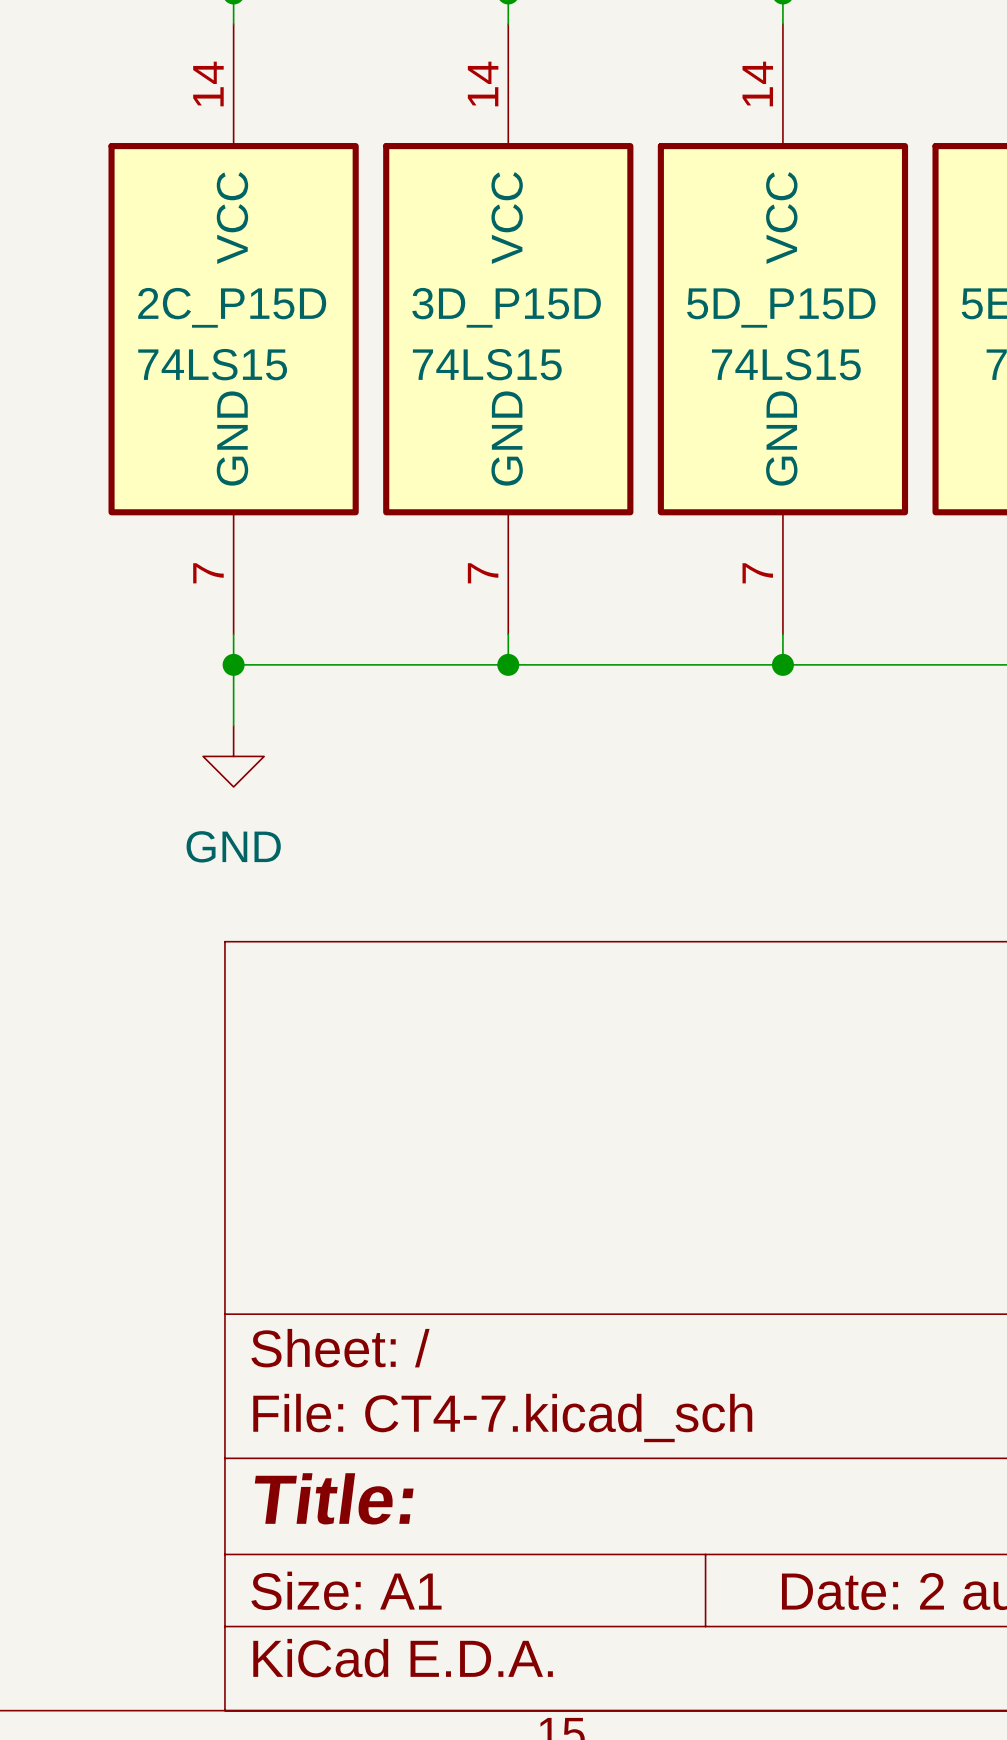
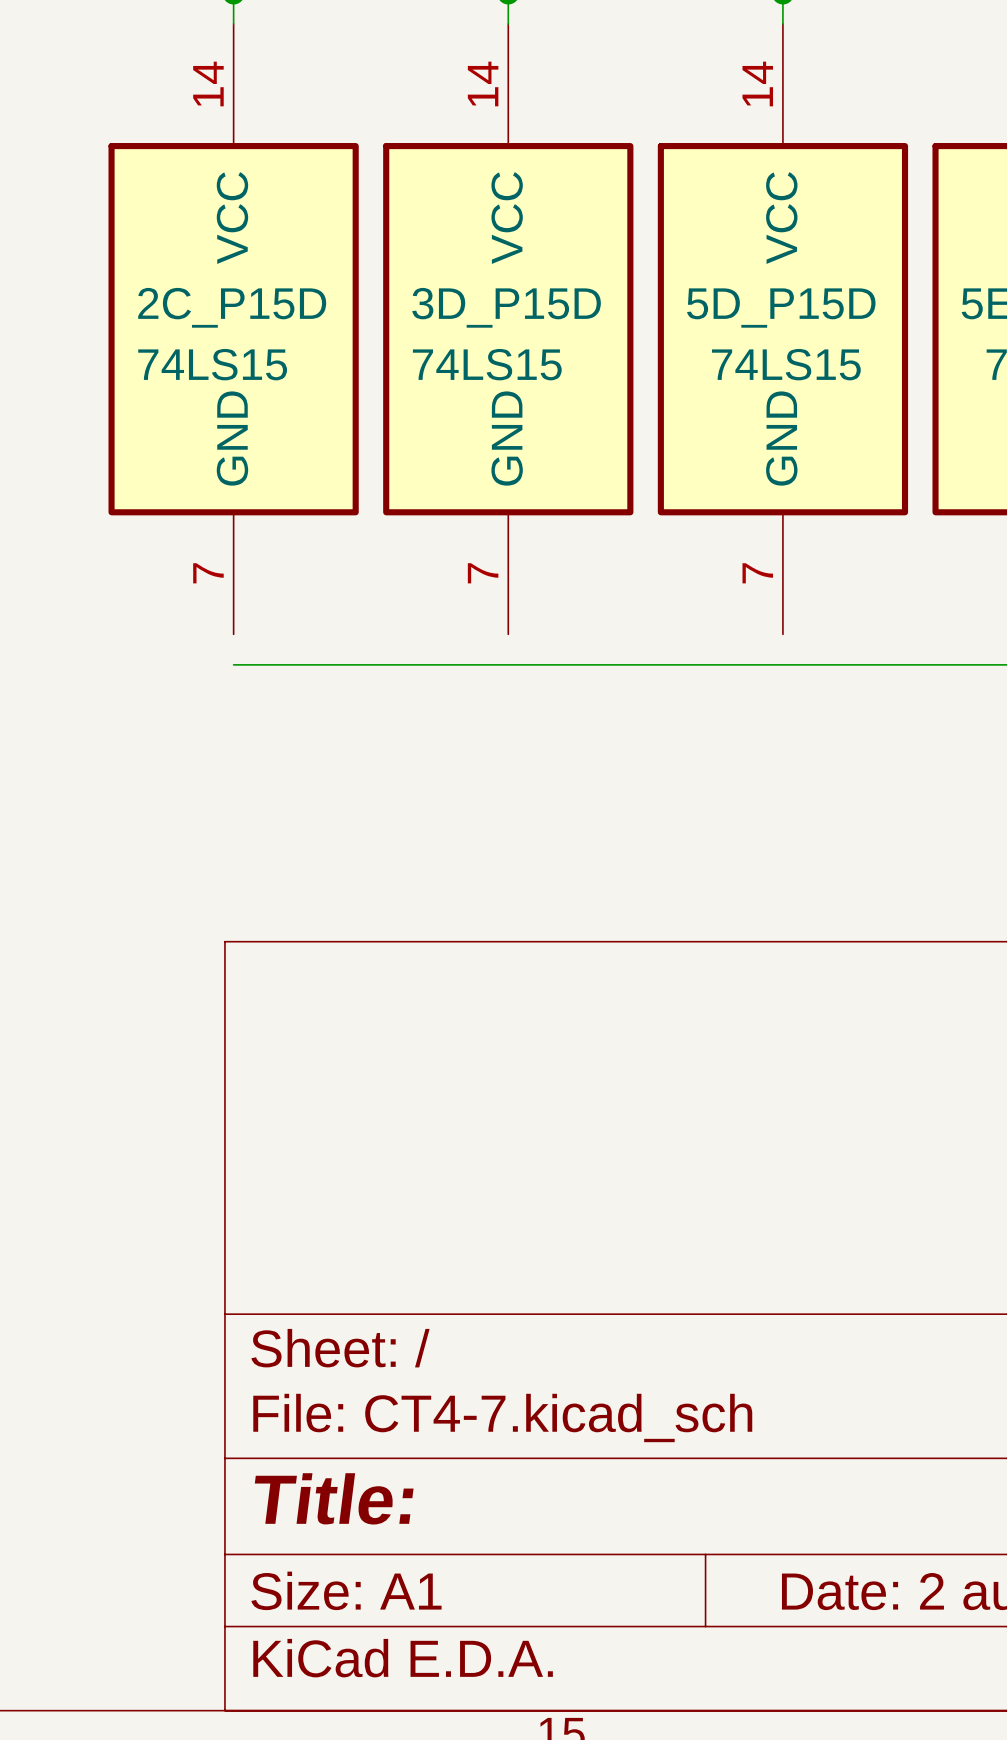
wire: (233, 634) (233, 725) -> none
wire: (508, 634) (508, 664) -> none
wire: (782, 634) (782, 664) -> none
junction: (233, 664) -> none
junction: (508, 664) -> none
junction: (782, 664) -> none
power symbol: GND (233, 756) -> none

